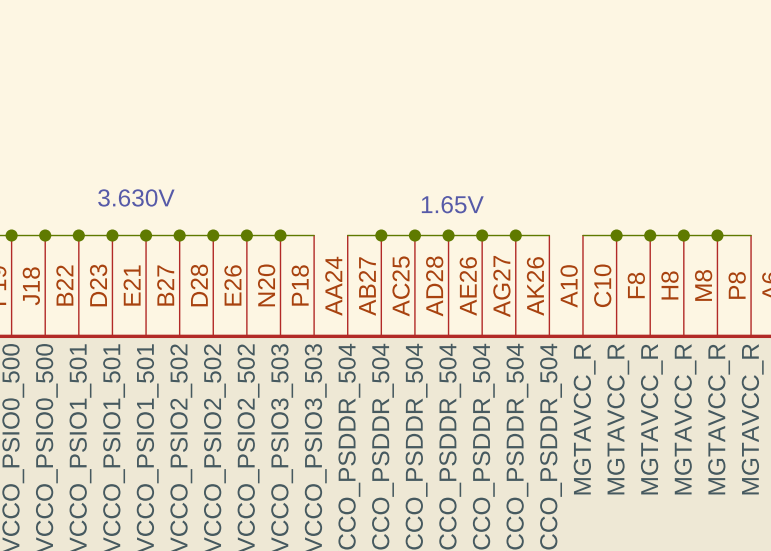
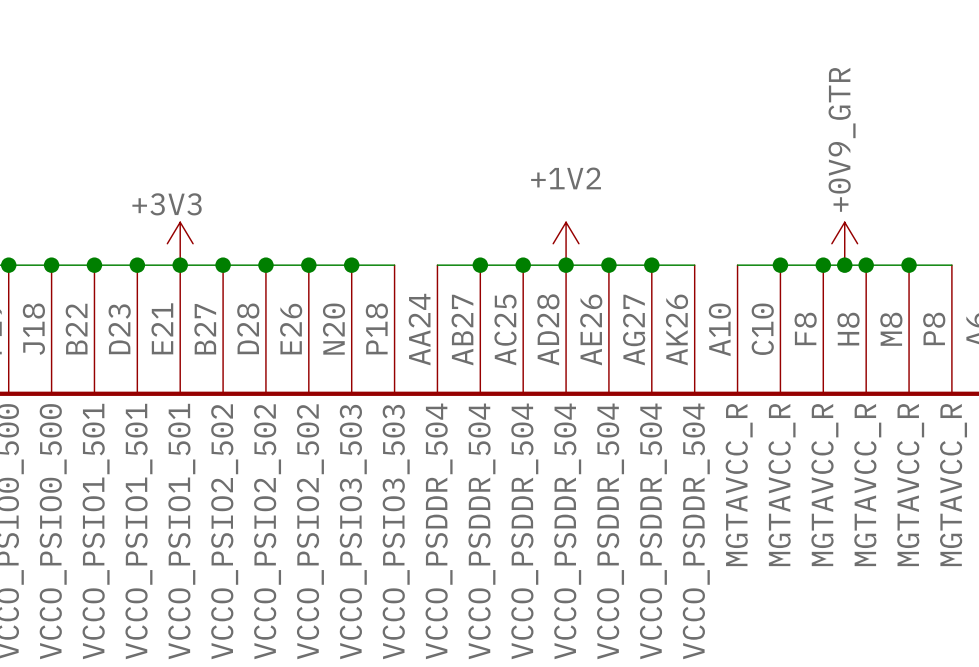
text: 3.630V (136, 197) -> none
text: 1.65V (452, 204) -> none
power symbol: none -> +3V3 (180, 243)
power symbol: none -> +1V2 (566, 243)
power symbol: none -> +0V9_GTR (844, 243)
junction: none -> (844, 265)

